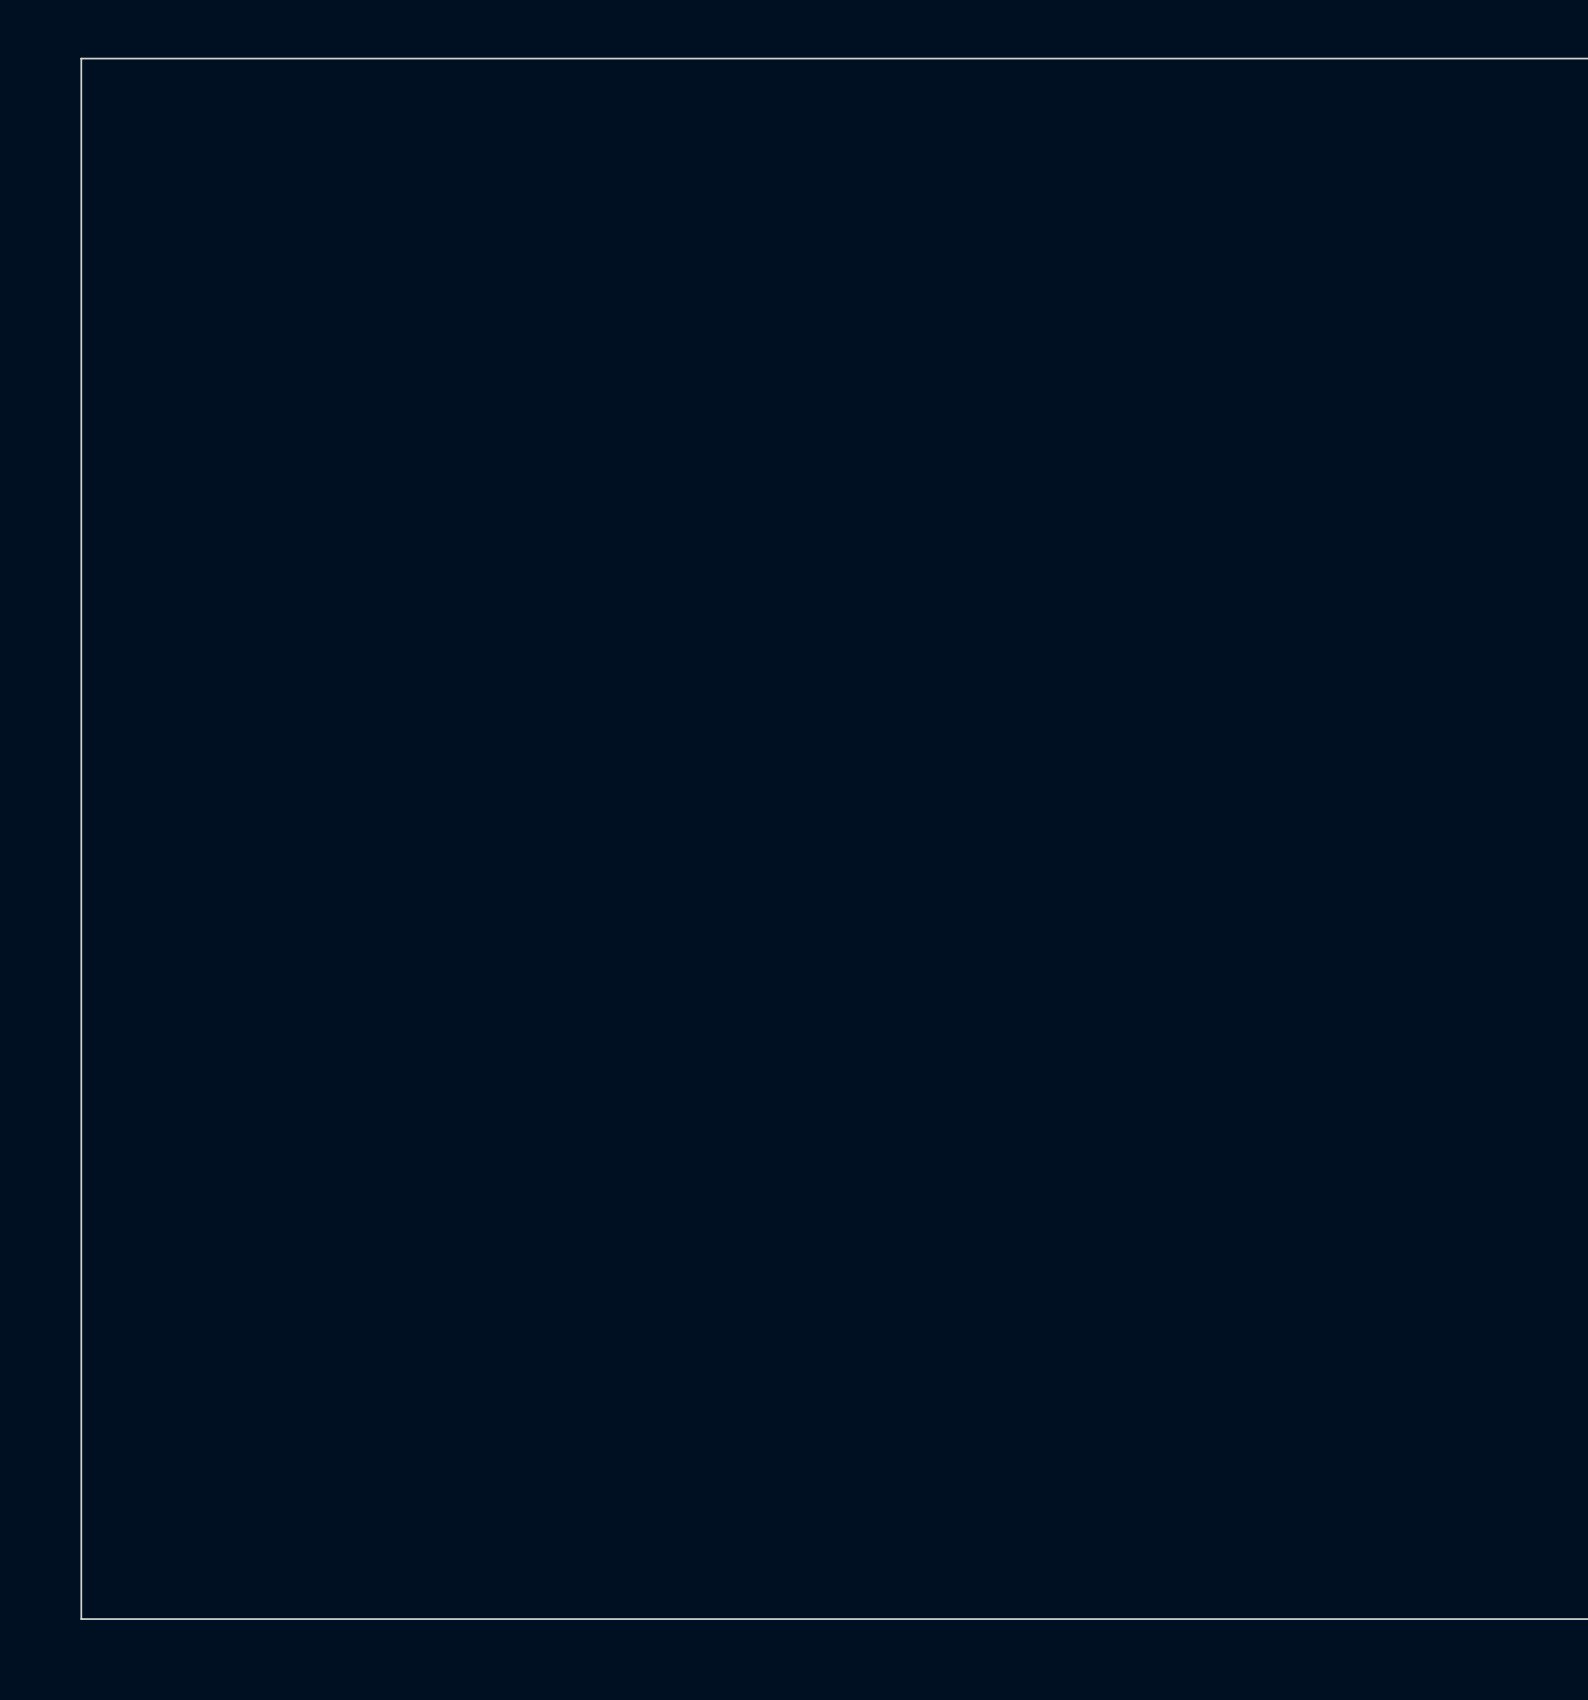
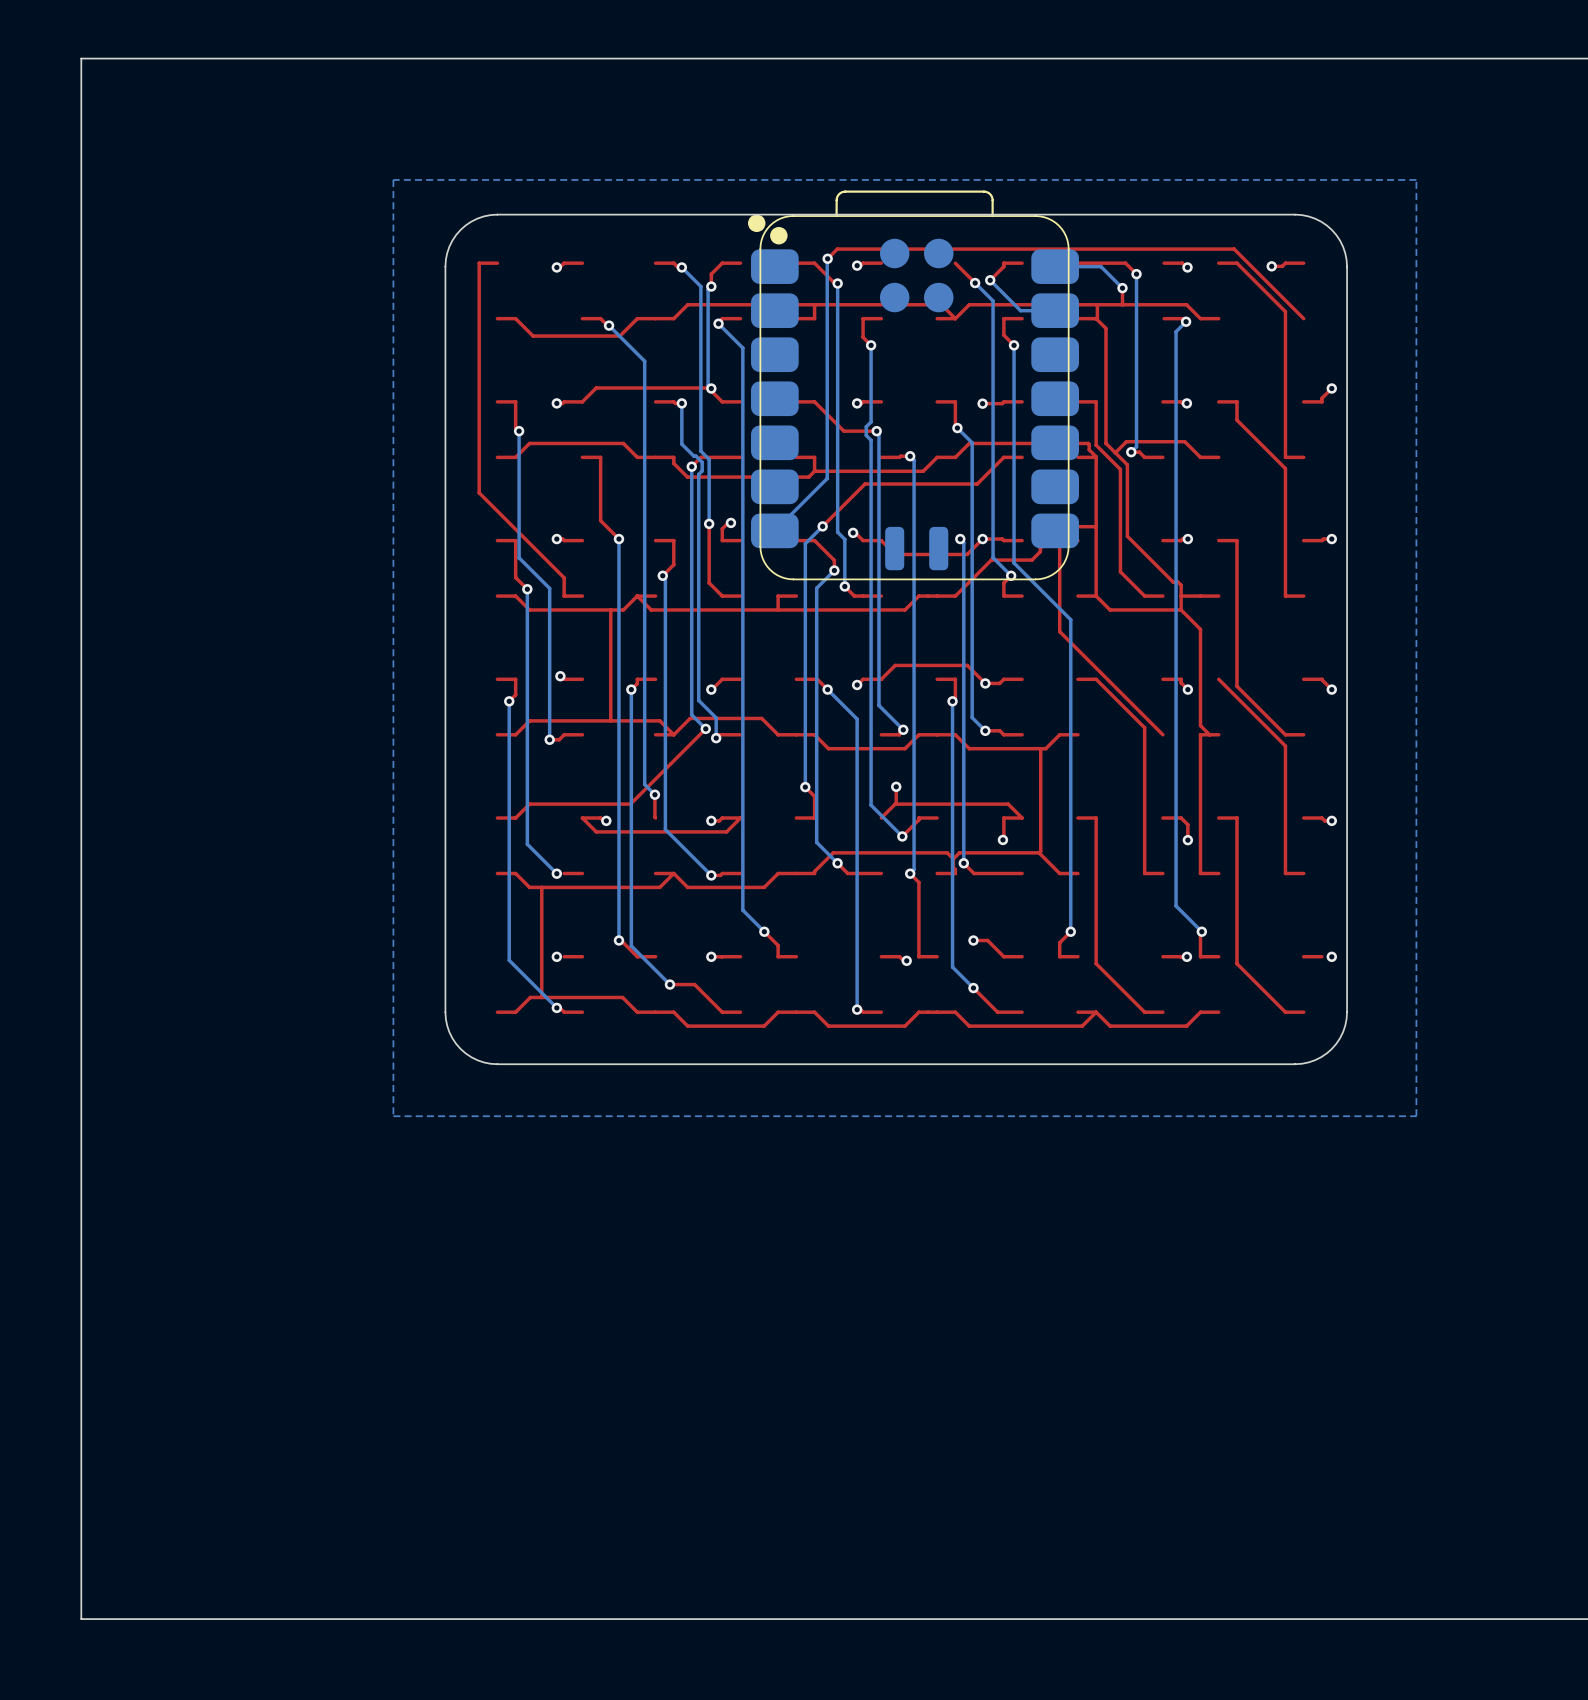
bottom zone outline: none -> (1416, 179) (393, 179) (393, 1116) (1416, 1116) (1416, 179)
board edge: none -> (1295, 214) (497, 214) (477, 218) (460, 229) (449, 246) (445, 266) (445, 1012) (449, 1032) (460, 1048) (477, 1060) (497, 1064) (1295, 1064) (1314, 1060) (1331, 1048) (1343, 1032) (1347, 1012) (1347, 266) (1343, 246) (1331, 229) (1314, 218) (1295, 214)
top track: none -> (827, 258) (837, 249) (1234, 249) (1303, 318)
bottom track: none -> (827, 258) (827, 478) (774, 530)
via: none -> (827, 258)
top track: none -> (497, 263) (479, 263) (479, 492) (564, 577) (564, 596) (582, 596)
top track: none -> (582, 263) (564, 263) (559, 267) (556, 267)
top track: none -> (655, 263) (673, 263) (678, 267) (681, 267)
top track: none -> (740, 263) (722, 263) (711, 274) (711, 286)
top track: none -> (796, 263) (814, 263) (834, 283) (837, 283)
top track: none -> (881, 263) (863, 263) (857, 265)
top track: none -> (955, 263) (975, 283)
top track: none -> (1022, 263) (1003, 263) (1003, 266) (990, 280)
top track: none -> (1079, 263) (1125, 263) (1136, 274)
top track: none -> (1164, 263) (1182, 263) (1187, 267)
top track: none -> (1218, 263) (1236, 263) (1285, 311) (1285, 457) (1303, 457)
top track: none -> (1303, 263) (1285, 263) (1282, 266) (1271, 266)
via: none -> (857, 265)
bottom track: none -> (1055, 266) (1101, 266) (1122, 288)
via: none -> (1271, 266)
via: none -> (556, 267)
bottom track: none -> (681, 267) (700, 286) (700, 451) (709, 459) (709, 523)
via: none -> (681, 267)
via: none -> (1187, 267)
bottom track: none -> (1136, 274) (1136, 446) (1131, 452)
via: none -> (1136, 274)
bottom track: none -> (990, 280) (1020, 310) (1055, 310)
via: none -> (990, 280)
bottom track: none -> (837, 283) (837, 532) (844, 539) (844, 586)
via: none -> (837, 283)
bottom track: none -> (975, 283) (993, 300) (993, 557) (1011, 575)
via: none -> (975, 283)
bottom track: none -> (711, 286) (708, 289) (708, 385) (711, 388)
via: none -> (711, 286)
top track: none -> (1122, 288) (1122, 304)
via: none -> (1122, 288)
top track: none -> (814, 304) (814, 318) (796, 318)
top track: none -> (1097, 304) (1097, 318) (1079, 318)
top track: none -> (582, 318) (600, 318) (609, 325)
top track: none -> (740, 318) (722, 318) (718, 323)
top track: none -> (881, 318) (863, 318) (863, 337) (871, 345)
top track: none -> (955, 318) (937, 318)
top track: none -> (955, 318) (941, 304) (687, 304) (673, 318) (637, 318) (619, 336) (533, 336) (515, 318) (497, 318)
top track: none -> (1022, 318) (1003, 318) (1003, 335) (1014, 345)
top track: none -> (1096, 318) (1106, 328) (1106, 443) (1127, 464) (1127, 536) (1173, 582) (1178, 582) (1181, 585) (1181, 609)
top track: none -> (1164, 318) (1182, 318) (1186, 321)
top track: none -> (1218, 318) (1200, 318) (1186, 304) (969, 304) (955, 318)
bottom track: none -> (1186, 321) (1176, 331) (1176, 905) (1201, 931)
via: none -> (1186, 321)
bottom track: none -> (718, 323) (742, 348) (742, 910) (764, 931)
via: none -> (718, 323)
bottom track: none -> (609, 325) (644, 361) (644, 784) (654, 794)
via: none -> (609, 325)
bottom track: none -> (871, 345) (871, 422) (866, 426) (866, 435) (871, 440) (871, 805) (902, 836)
via: none -> (871, 345)
bottom track: none -> (1014, 345) (1014, 563) (1070, 619) (1070, 931)
via: none -> (1014, 345)
part: none -> (913, 385)
via: none -> (711, 388)
top track: none -> (1331, 388) (1321, 398) (1321, 401) (1303, 401)
via: none -> (1331, 388)
top track: none -> (497, 401) (515, 401) (515, 427) (519, 431)
top track: none -> (655, 401) (681, 403)
top track: none -> (740, 401) (722, 401) (710, 387) (596, 387) (582, 401) (556, 403)
top track: none -> (796, 401) (814, 401) (843, 431) (876, 431)
top track: none -> (881, 401) (857, 403)
top track: none -> (937, 401) (955, 401) (955, 426) (957, 428)
top track: none -> (1022, 401) (982, 403)
top track: none -> (1077, 401) (1096, 401) (1096, 445) (1120, 469) (1120, 571) (1144, 596) (1162, 596)
top track: none -> (1162, 401) (1186, 403)
top track: none -> (1218, 401) (1236, 401) (1236, 420) (1285, 468) (1285, 596) (1303, 596)
via: none -> (556, 403)
bottom track: none -> (681, 403) (681, 444) (702, 462) (702, 470) (698, 474) (698, 700) (716, 717) (716, 738)
via: none -> (681, 403)
via: none -> (857, 403)
via: none -> (982, 403)
via: none -> (1186, 403)
bottom track: none -> (957, 428) (972, 442) (972, 717) (985, 730)
via: none -> (957, 428)
bottom track: none -> (519, 431) (519, 557) (549, 588) (549, 739)
via: none -> (519, 431)
bottom track: none -> (876, 431) (878, 433) (878, 705) (903, 729)
via: none -> (876, 431)
top track: none -> (1115, 452) (1126, 441) (1184, 441) (1200, 457) (1218, 457)
top track: none -> (1131, 452) (1139, 452) (1144, 457) (1162, 457)
via: none -> (1131, 452)
top track: none -> (910, 456) (881, 457)
bottom track: none -> (910, 456) (914, 460) (914, 869) (910, 873)
via: none -> (910, 456)
top track: none -> (497, 457) (515, 457) (529, 443) (623, 443) (637, 457) (673, 457) (673, 463) (687, 477) (808, 477) (814, 471)
top track: none -> (582, 457) (600, 457) (600, 520) (618, 539)
top track: none -> (740, 457) (701, 457) (691, 466)
top track: none -> (796, 457) (814, 457) (814, 471)
top track: none -> (1022, 457) (1003, 457) (977, 484) (865, 484) (822, 526)
top track: none -> (1096, 457) (1077, 457)
bottom track: none -> (691, 466) (691, 714) (705, 728)
via: none -> (691, 466)
top track: none -> (814, 471) (923, 471) (937, 457) (955, 457) (969, 443) (1088, 443) (1089, 449) (1096, 456) (1096, 596)
top track: none -> (730, 522) (728, 522) (722, 528) (722, 540) (740, 540)
via: none -> (730, 522)
top track: none -> (709, 523) (709, 582) (722, 596) (740, 596)
via: none -> (709, 523)
bottom track: none -> (822, 526) (805, 543) (805, 787)
via: none -> (822, 526)
top track: none -> (1096, 526) (1062, 526) (1040, 548) (1040, 551) (1032, 560) (991, 560) (955, 596) (918, 596) (905, 609) (651, 609) (637, 596)
top track: none -> (853, 532) (863, 540) (881, 540) (895, 554) (967, 554) (982, 539) (1022, 540)
via: none -> (853, 532)
top track: none -> (556, 539) (582, 540)
via: none -> (556, 539)
bottom track: none -> (618, 539) (618, 940)
via: none -> (618, 539)
bottom track: none -> (960, 539) (963, 542) (963, 863)
via: none -> (960, 539)
via: none -> (982, 539)
top track: none -> (1187, 539) (1162, 540)
via: none -> (1187, 539)
top track: none -> (1331, 539) (1303, 540)
via: none -> (1331, 539)
top track: none -> (497, 540) (515, 540) (515, 577) (527, 589)
top track: none -> (655, 540) (673, 540) (673, 564) (662, 575)
top track: none -> (796, 540) (814, 540) (834, 560) (834, 570)
top track: none -> (1077, 540) (1059, 540) (1059, 631) (1162, 734)
top track: none -> (1218, 540) (1236, 540) (1236, 686) (1285, 734) (1303, 734)
bottom track: none -> (834, 570) (816, 588) (816, 842) (837, 863)
via: none -> (834, 570)
bottom track: none -> (662, 575) (665, 578) (665, 829) (711, 875)
via: none -> (662, 575)
top track: none -> (1011, 575) (1003, 583) (1003, 596) (1022, 596)
via: none -> (1011, 575)
top track: none -> (844, 586) (854, 596) (881, 596)
via: none -> (844, 586)
bottom track: none -> (527, 589) (527, 844) (556, 873)
via: none -> (527, 589)
top track: none -> (637, 596) (623, 609) (529, 609) (515, 596) (497, 596)
top track: none -> (655, 596) (637, 596)
top track: none -> (796, 596) (778, 596) (778, 609)
top track: none -> (1096, 596) (1077, 596)
top track: none -> (1096, 596) (1110, 609) (1181, 609)
top track: none -> (1218, 596) (1181, 596)
top track: none -> (610, 609) (610, 720)
top track: none -> (1181, 609) (1200, 629) (1200, 725) (1209, 734)
top track: none -> (560, 676) (564, 679) (582, 679)
via: none -> (560, 676)
top track: none -> (497, 679) (515, 679) (515, 694) (509, 701)
top track: none -> (655, 679) (637, 679) (637, 683) (631, 689)
top track: none -> (740, 679) (722, 679) (711, 689)
top track: none -> (796, 679) (817, 679) (827, 689)
top track: none -> (937, 679) (955, 679) (955, 698) (952, 701)
top track: none -> (1022, 679) (1003, 679) (999, 683) (985, 683) (967, 665) (895, 665) (881, 679) (863, 679) (857, 684)
top track: none -> (1077, 679) (1096, 679) (1144, 727) (1144, 873) (1162, 873)
top track: none -> (1162, 679) (1181, 679) (1181, 682) (1187, 689)
top track: none -> (1218, 679) (1285, 746) (1285, 873) (1303, 873)
top track: none -> (1303, 679) (1321, 679) (1331, 689)
via: none -> (985, 683)
via: none -> (857, 684)
bottom track: none -> (631, 689) (631, 945) (669, 984)
via: none -> (631, 689)
via: none -> (711, 689)
bottom track: none -> (827, 689) (857, 719) (857, 1009)
via: none -> (827, 689)
via: none -> (1187, 689)
via: none -> (1331, 689)
bottom track: none -> (509, 701) (509, 960) (556, 1007)
via: none -> (509, 701)
bottom track: none -> (952, 701) (952, 967) (973, 988)
via: none -> (952, 701)
top track: none -> (705, 728) (630, 804) (529, 804) (515, 818) (497, 818)
via: none -> (705, 728)
top track: none -> (903, 729) (899, 734) (881, 734)
via: none -> (903, 729)
top track: none -> (985, 730) (999, 730) (1003, 734) (1022, 734)
via: none -> (985, 730)
top track: none -> (582, 734) (564, 734) (559, 739) (549, 739)
top track: none -> (673, 734) (655, 734)
top track: none -> (673, 734) (659, 720) (529, 720) (515, 734) (497, 734)
top track: none -> (740, 734) (719, 734) (716, 738)
top track: none -> (1077, 734) (1059, 734) (1045, 748) (969, 748) (955, 734) (918, 734) (905, 748) (828, 748) (814, 734) (778, 734) (761, 718) (690, 718) (673, 734)
top track: none -> (1218, 734) (1200, 734) (1200, 873) (1218, 873)
via: none -> (716, 738)
via: none -> (549, 739)
top track: none -> (1040, 748) (1040, 851) (1039, 852)
top track: none -> (896, 786) (896, 803) (881, 818)
via: none -> (896, 786)
top track: none -> (805, 787) (814, 796) (814, 818) (796, 818)
via: none -> (805, 787)
top track: none -> (654, 794) (655, 818)
via: none -> (654, 794)
top track: none -> (895, 804) (1008, 804) (1022, 818) (1003, 818) (1002, 839)
top track: none -> (937, 818) (918, 818) (902, 836)
top track: none -> (1077, 818) (1096, 818) (1096, 963) (1144, 1012) (1162, 1012)
top track: none -> (1162, 818) (1181, 818) (1187, 824) (1187, 840)
top track: none -> (1218, 818) (1236, 818) (1236, 963) (1285, 1012) (1303, 1012)
top track: none -> (1303, 818) (1321, 818) (1324, 820) (1331, 820)
via: none -> (606, 820)
top track: none -> (711, 820) (719, 820) (722, 818) (740, 818) (726, 831) (596, 831) (582, 818) (600, 818) (606, 820)
via: none -> (711, 820)
via: none -> (1331, 820)
via: none -> (902, 836)
via: none -> (1002, 839)
via: none -> (1187, 840)
top track: none -> (1039, 852) (1059, 873) (1077, 873)
top track: none -> (1039, 852) (959, 852) (953, 858)
top track: none -> (953, 858) (955, 873) (937, 873)
top track: none -> (953, 858) (947, 852) (833, 852) (814, 873) (778, 873) (764, 887) (687, 887) (673, 873)
top track: none -> (837, 863) (847, 873) (881, 873)
via: none -> (837, 863)
top track: none -> (963, 863) (974, 873) (1022, 873)
via: none -> (963, 863)
via: none -> (556, 873)
top track: none -> (582, 873) (564, 873)
top track: none -> (673, 873) (659, 887) (529, 887) (515, 873) (497, 873)
top track: none -> (673, 873) (655, 873)
top track: none -> (740, 873) (711, 875)
top track: none -> (910, 873) (918, 882) (918, 956) (937, 956)
via: none -> (910, 873)
via: none -> (711, 875)
top track: none -> (541, 887) (541, 997)
top track: none -> (764, 931) (778, 945) (778, 956) (796, 956)
via: none -> (764, 931)
top track: none -> (1070, 931) (1059, 942) (1059, 956) (1077, 956)
via: none -> (1070, 931)
top track: none -> (1201, 931) (1200, 956) (1218, 956)
via: none -> (1201, 931)
top track: none -> (618, 940) (637, 956) (655, 956)
via: none -> (618, 940)
top track: none -> (973, 940) (987, 940) (1003, 956) (1022, 956)
via: none -> (973, 940)
via: none -> (556, 956)
top track: none -> (582, 956) (564, 956)
via: none -> (711, 956)
top track: none -> (722, 956) (711, 956)
top track: none -> (740, 956) (722, 956)
top track: none -> (881, 956) (899, 956) (903, 960) (906, 960)
top track: none -> (1181, 956) (1162, 956)
via: none -> (1186, 956)
top track: none -> (1321, 956) (1303, 956)
via: none -> (1331, 956)
via: none -> (906, 960)
top track: none -> (669, 984) (694, 984) (722, 1012) (740, 1012)
via: none -> (669, 984)
top track: none -> (973, 988) (997, 1012) (1022, 1012)
via: none -> (973, 988)
top track: none -> (556, 1007) (559, 1007) (564, 1012) (582, 1012)
via: none -> (556, 1007)
top track: none -> (857, 1009) (863, 1012) (881, 1012)
via: none -> (857, 1009)
top track: none -> (1096, 1012) (1077, 1012)
top track: none -> (1096, 1012) (1082, 1026) (969, 1026) (955, 1012) (918, 1012) (905, 1026) (828, 1026) (814, 1012) (778, 1012) (764, 1026) (687, 1026) (673, 1012) (637, 1012) (622, 997) (530, 997) (515, 1012) (497, 1012)
top track: none -> (1218, 1012) (1200, 1012) (1186, 1026) (1110, 1026) (1096, 1012)

